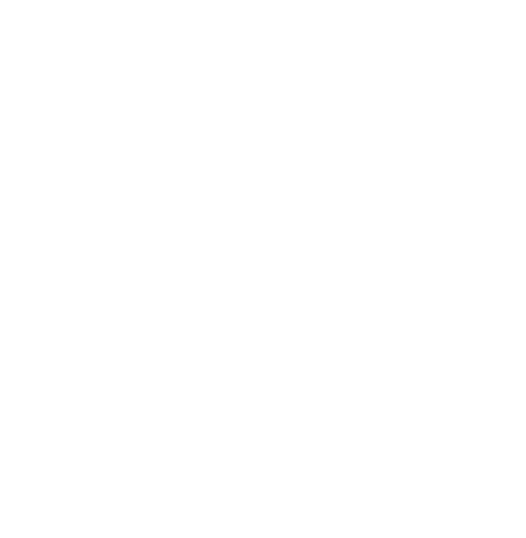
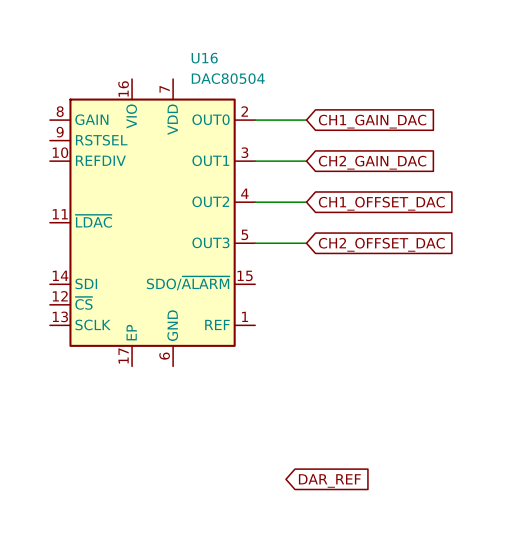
wire: none -> (255, 120) (306, 120)
global label: none -> CH1_GAIN_DAC (372, 121)
wire: none -> (255, 161) (306, 161)
global label: none -> CH2_GAIN_DAC (372, 162)
wire: none -> (255, 202) (306, 202)
global label: none -> CH1_OFFSET_DAC (381, 203)
U16: none -> DAC80504 (152, 222)
wire: none -> (255, 243) (306, 243)
global label: none -> CH2_OFFSET_DAC (381, 244)
global label: none -> DAR_REF (329, 480)

